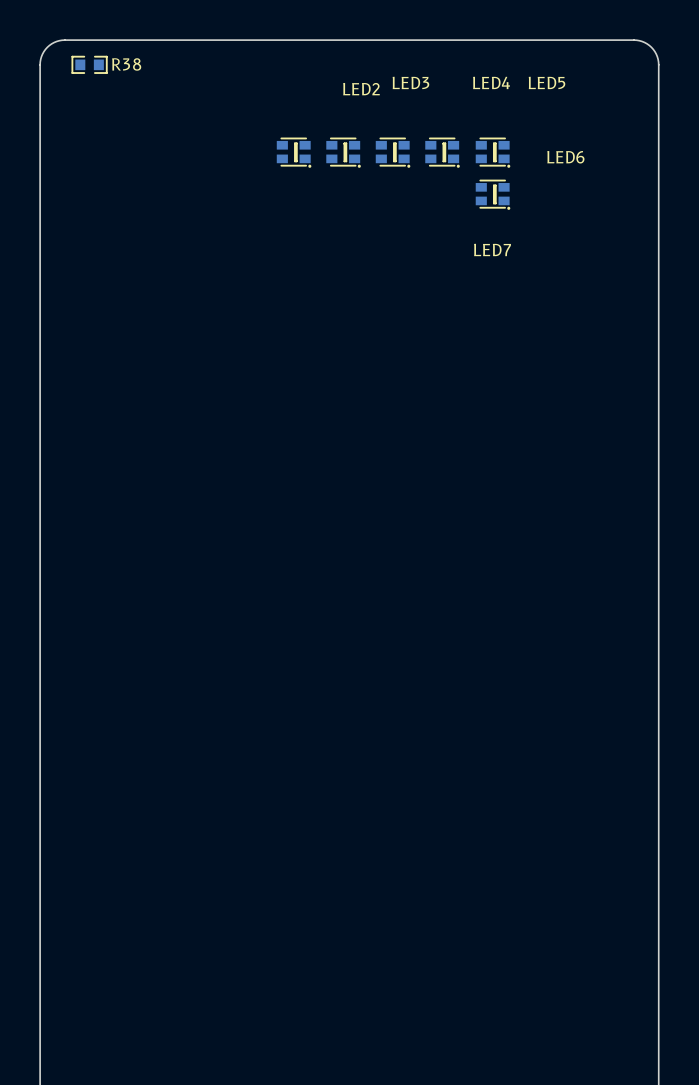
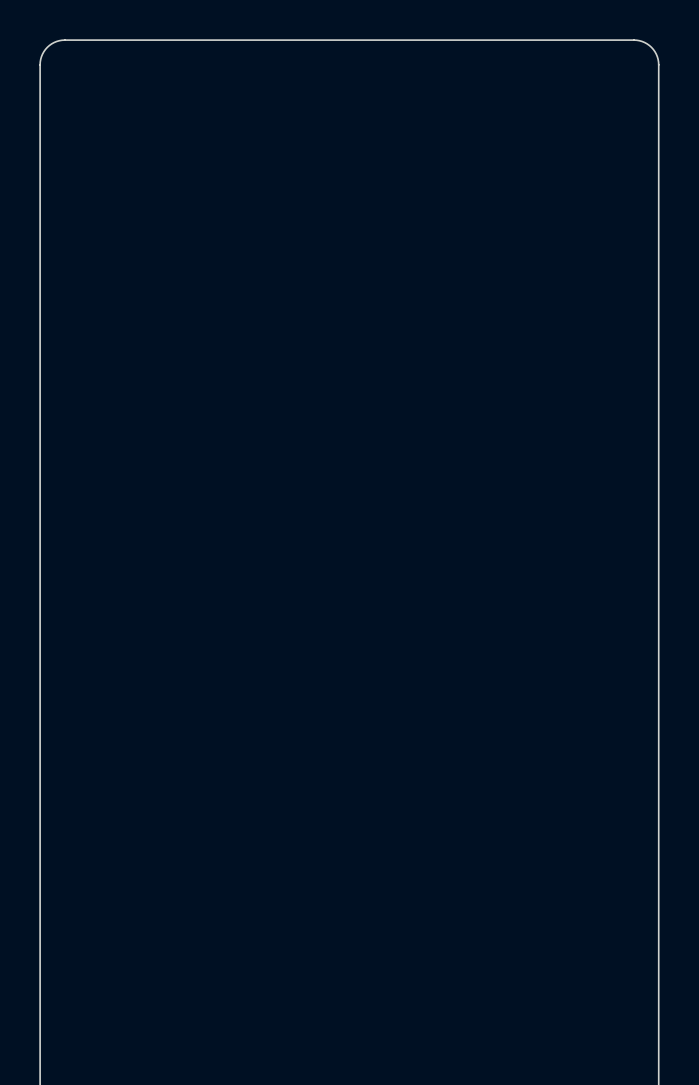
R38: (89, 64) -> none
LED2: (294, 152) -> none
LED3: (343, 152) -> none
LED4: (393, 152) -> none
LED5: (442, 152) -> none
LED6: (493, 152) -> none
LED7: (493, 194) -> none

